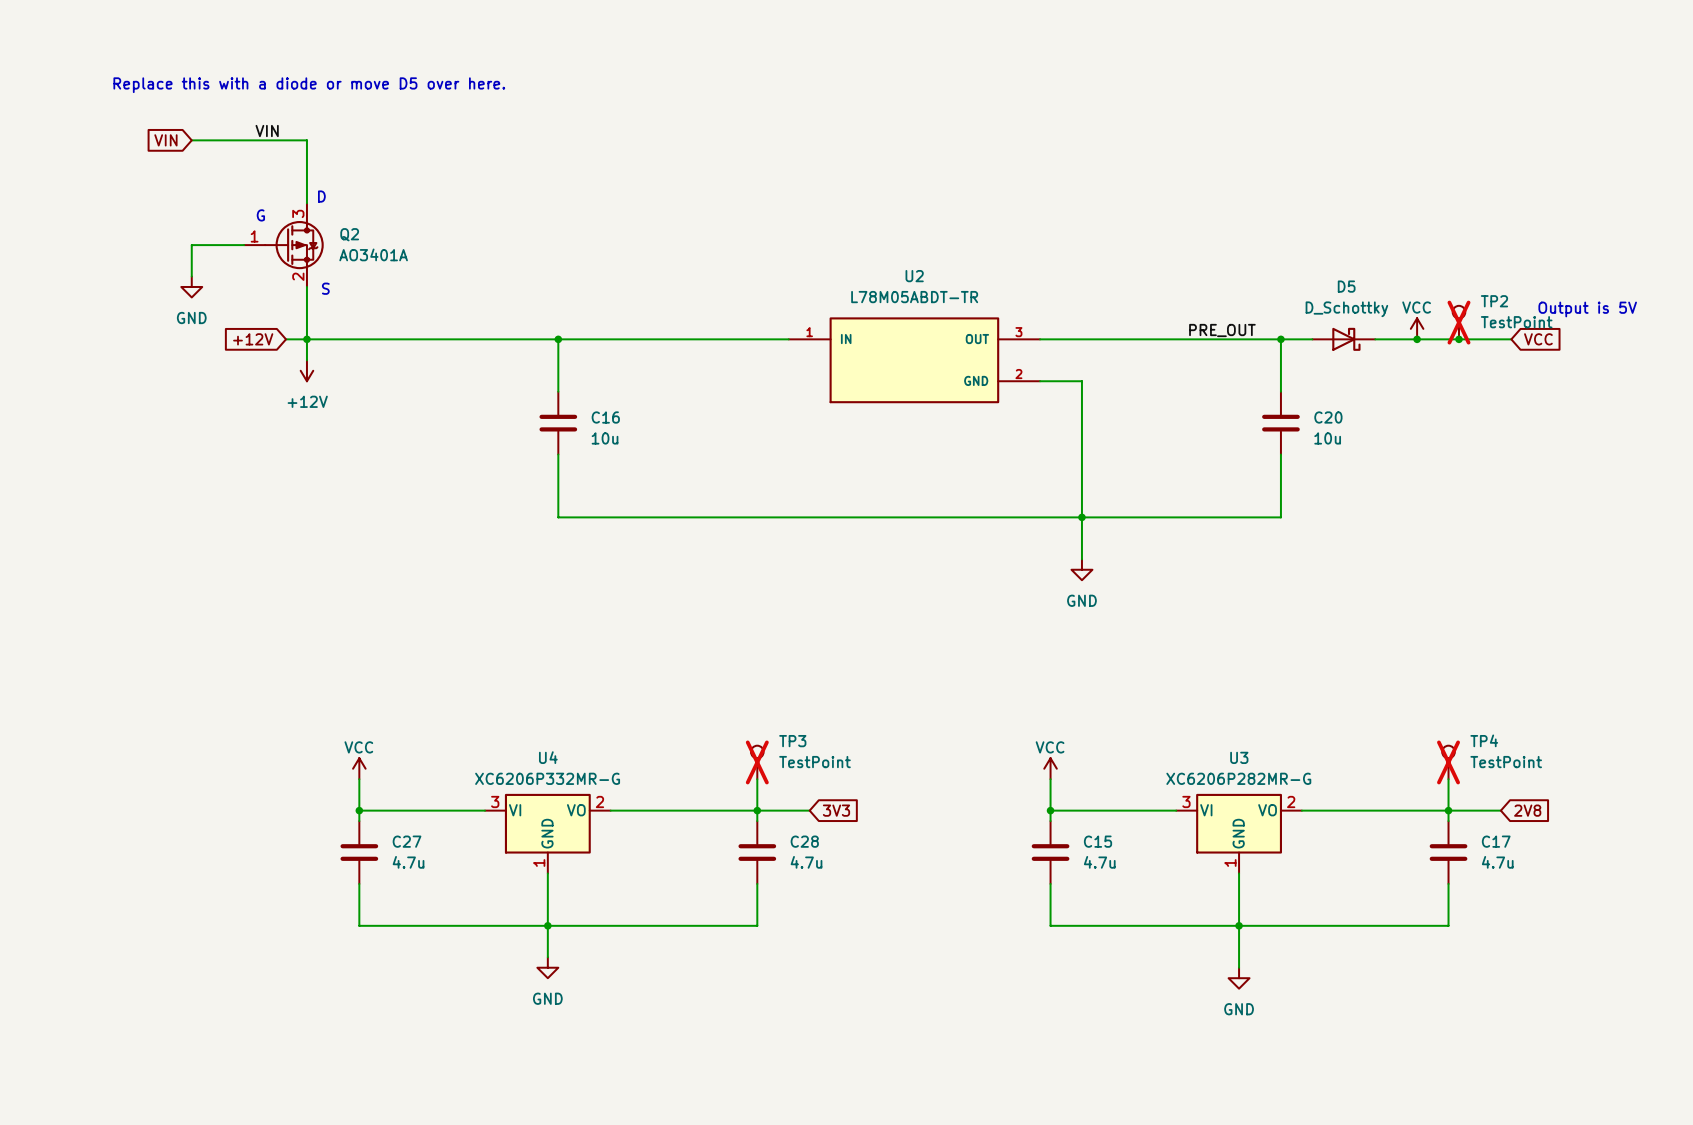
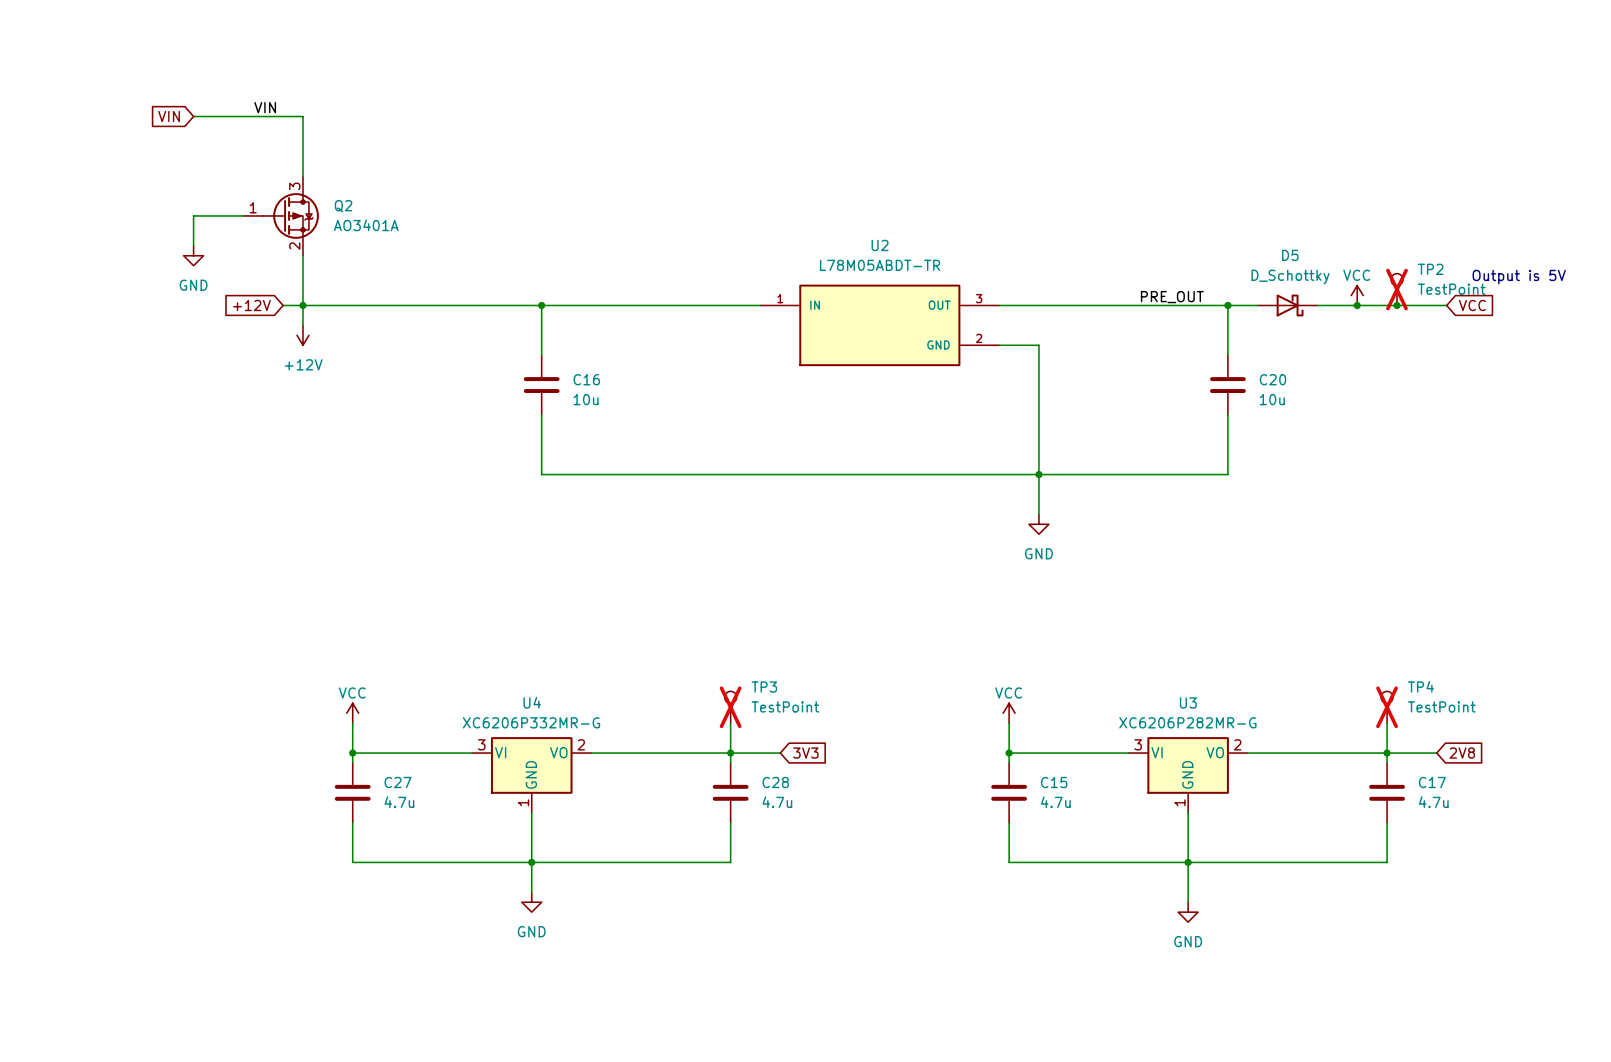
text: Replace this with a diode or move D5 over here. (309, 85) -> none
text: D (321, 196) -> none
text: G (260, 215) -> none
text: S (325, 288) -> none

